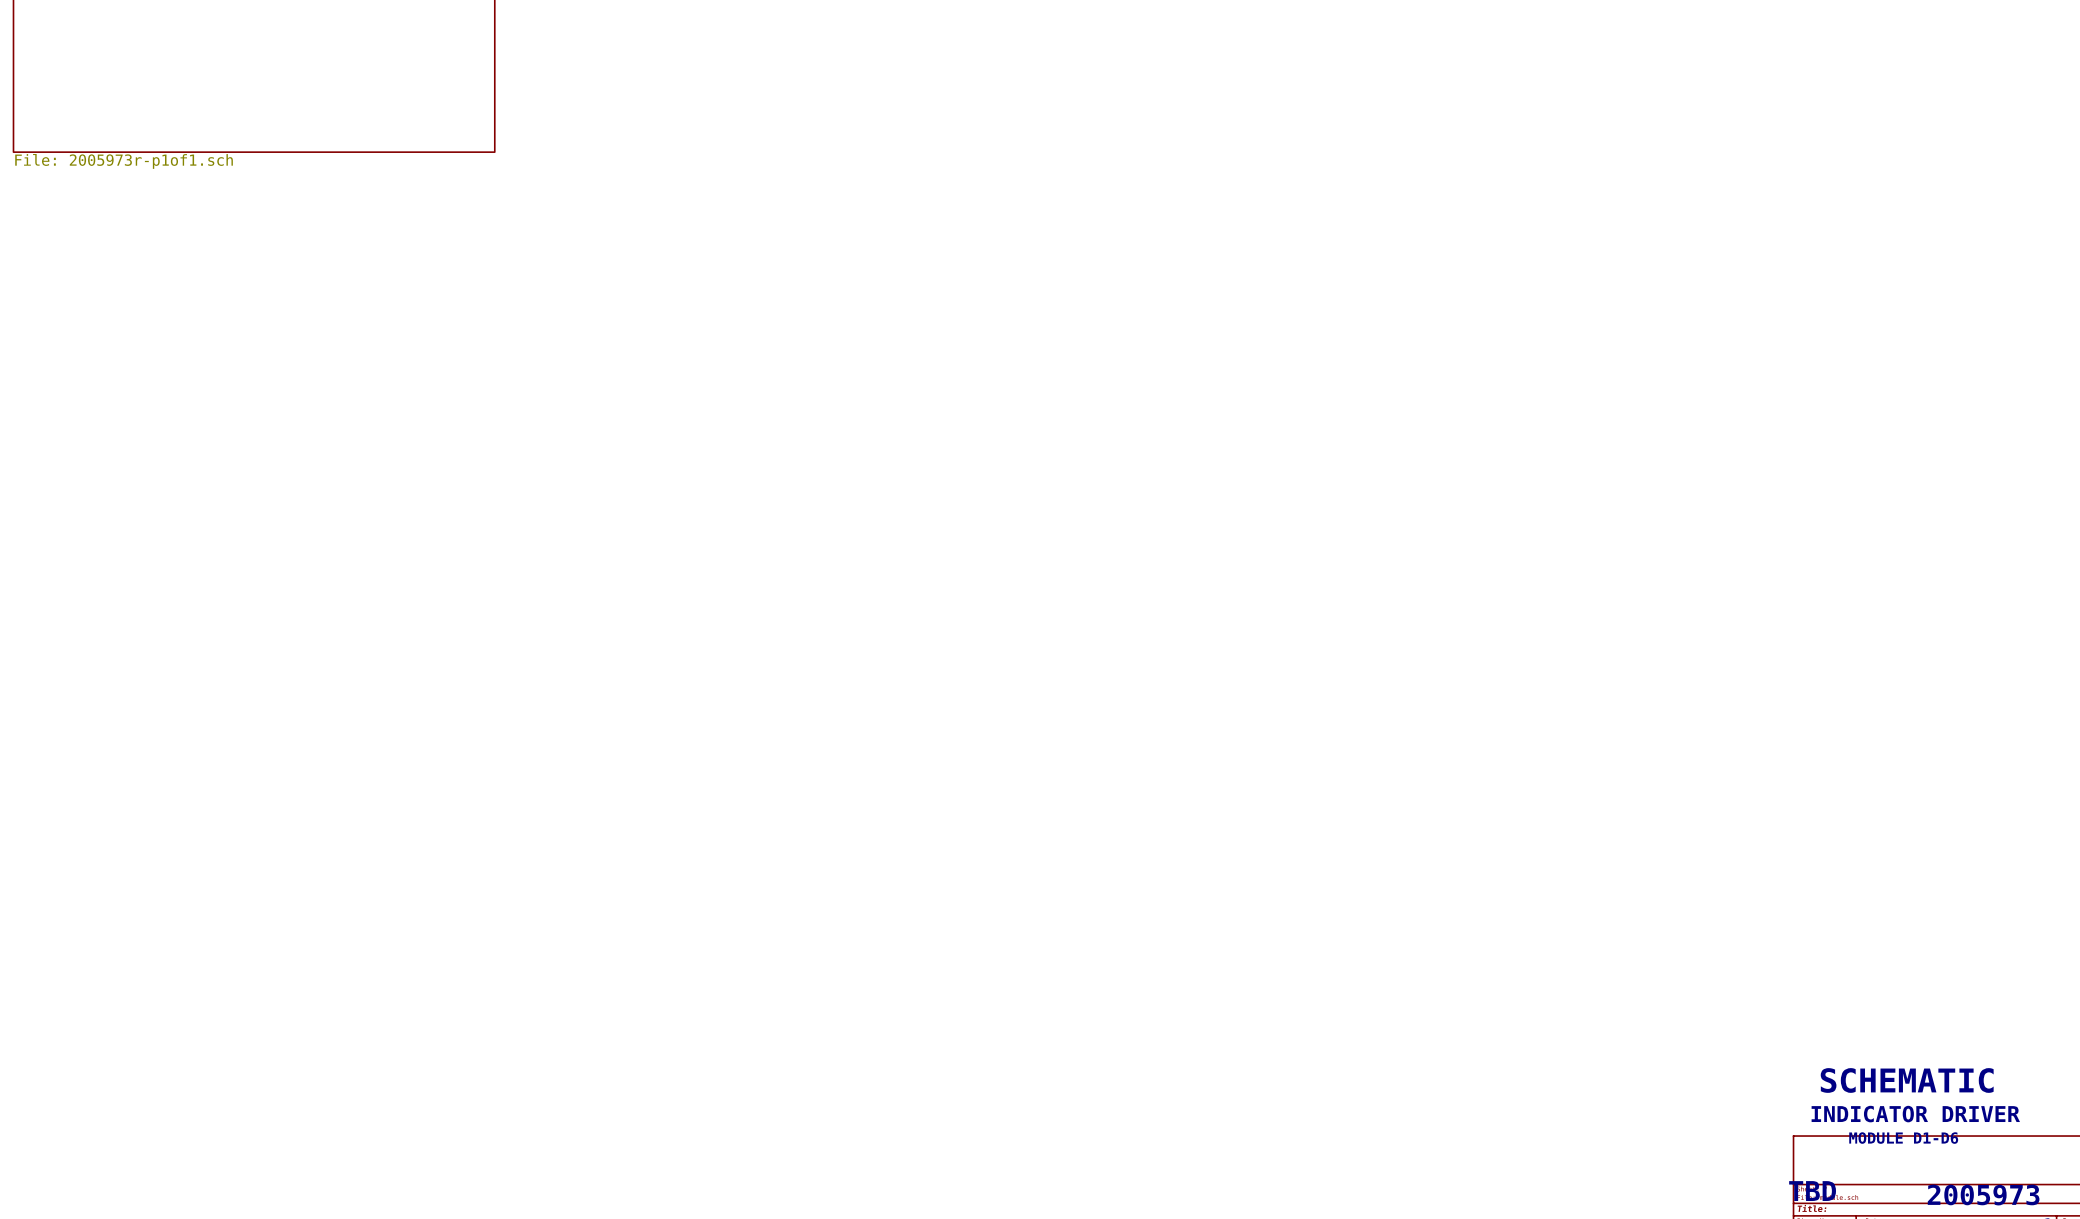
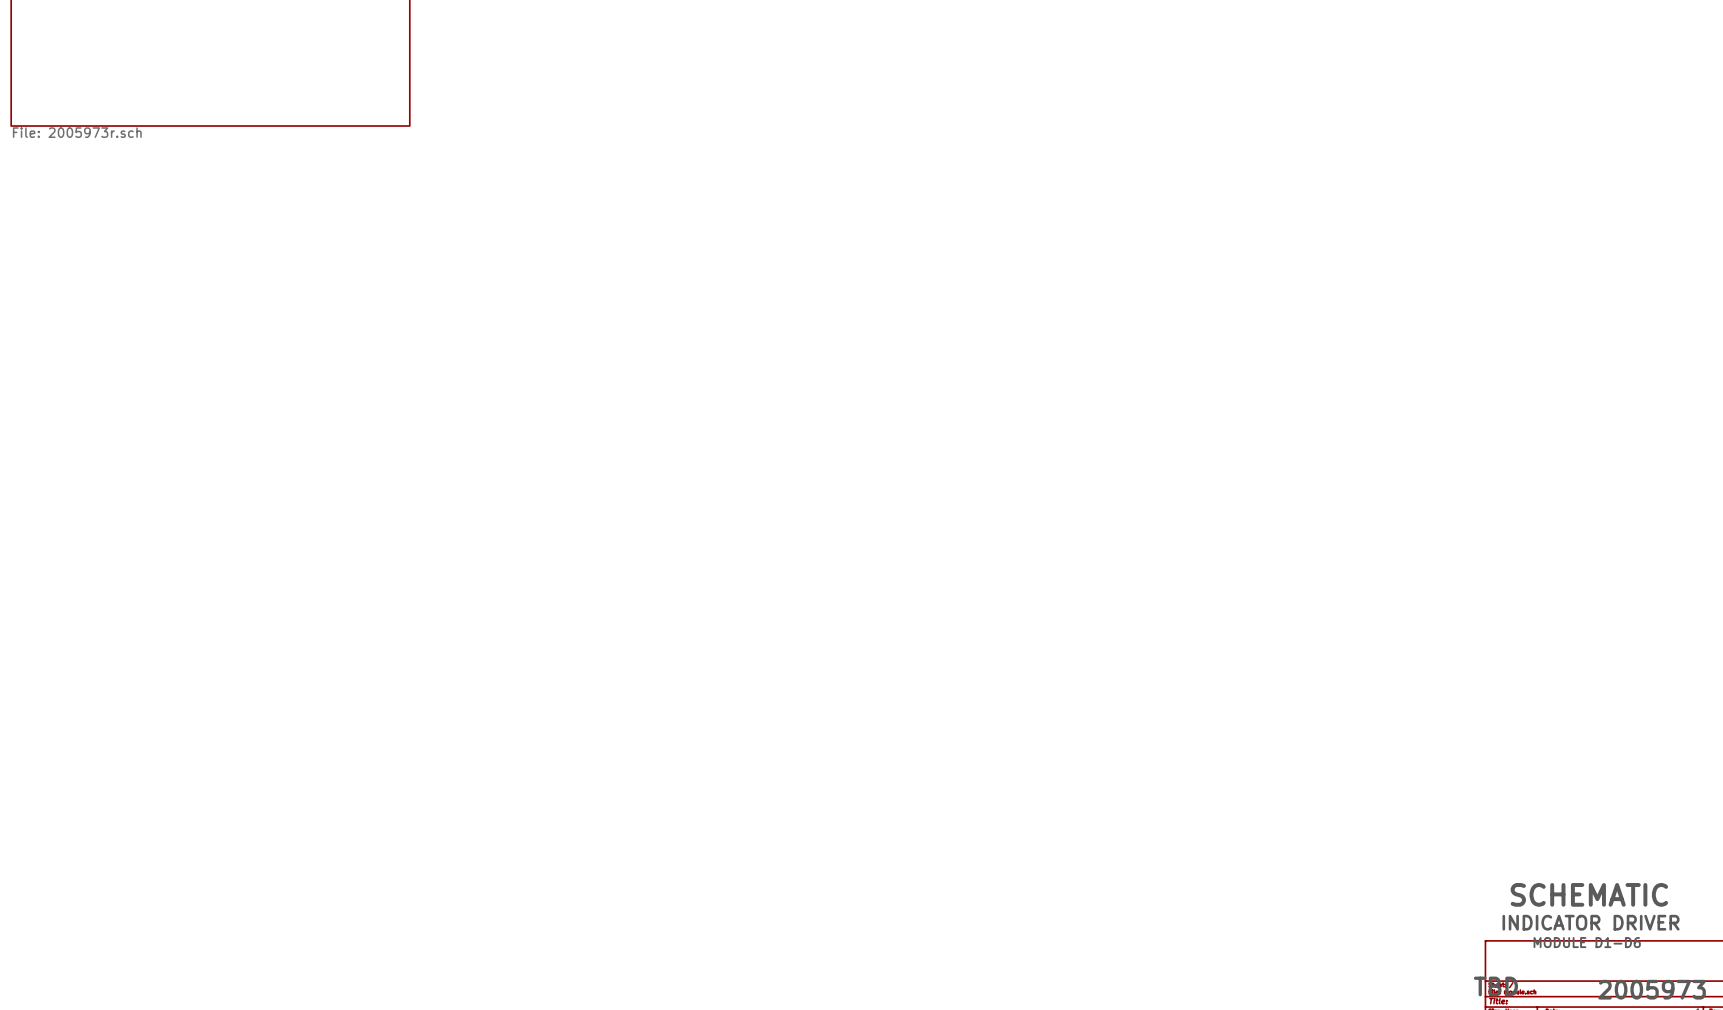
sheet value: File: 2005973r-p1of1.sch (124, 161) -> File: 2005973r.sch (77, 132)

